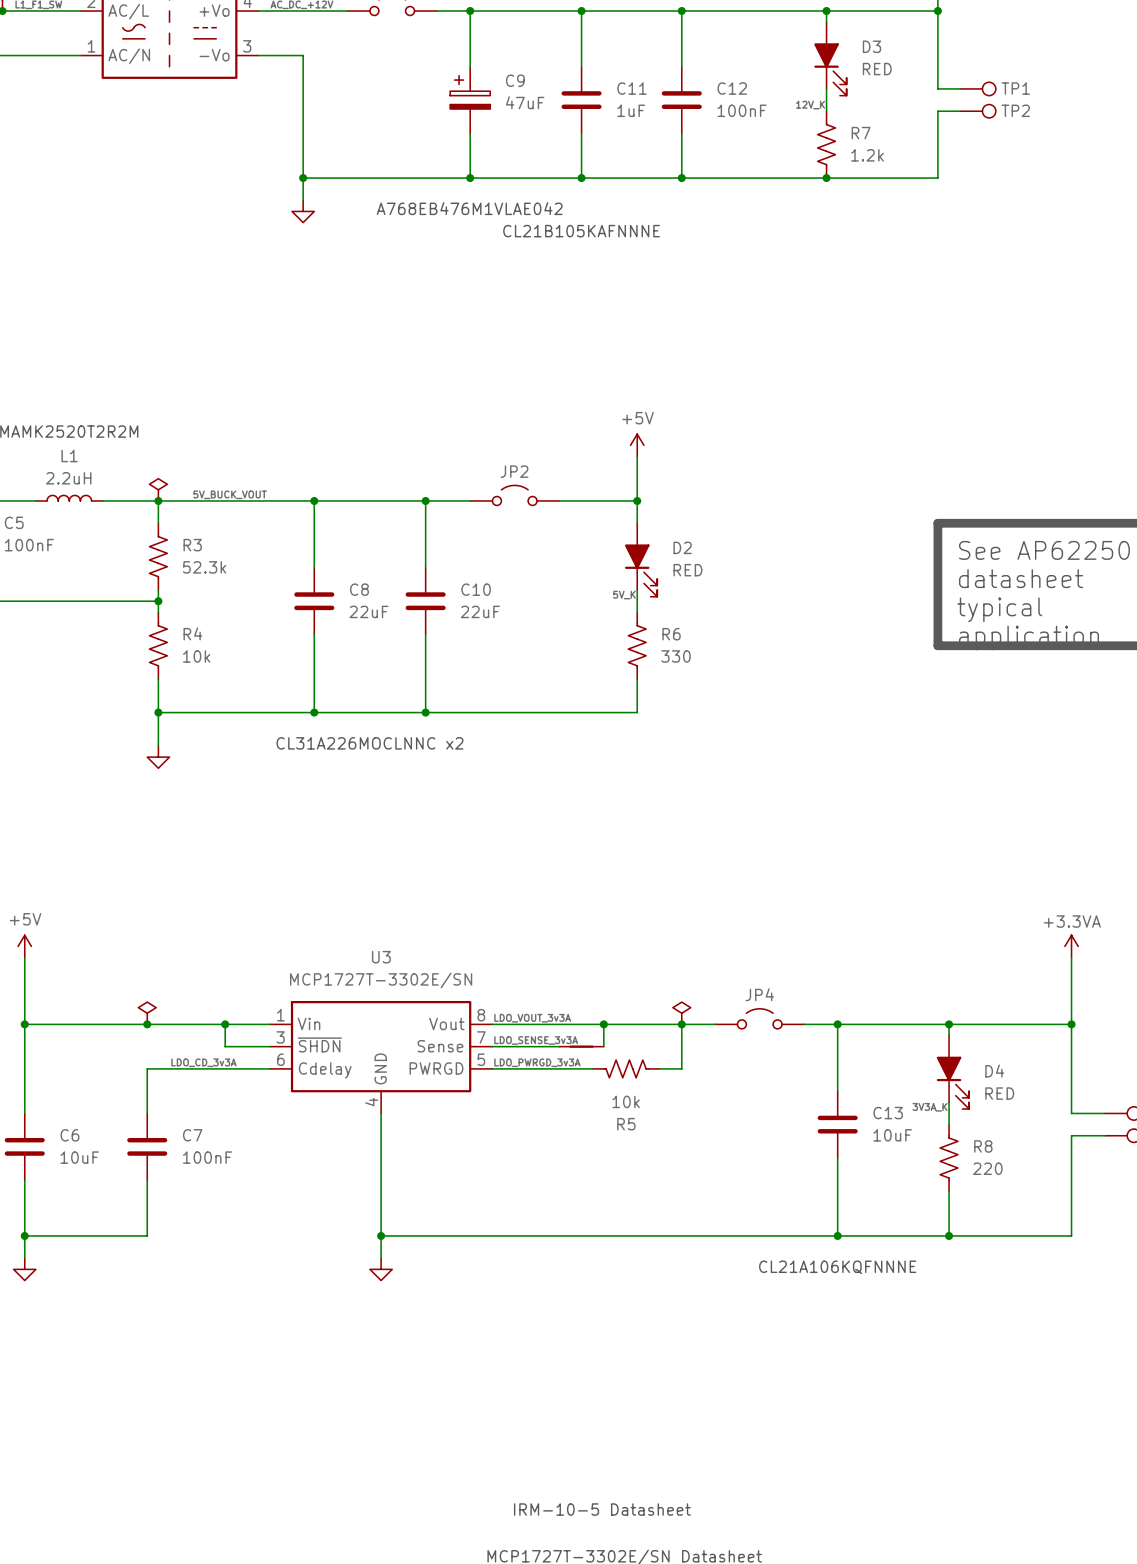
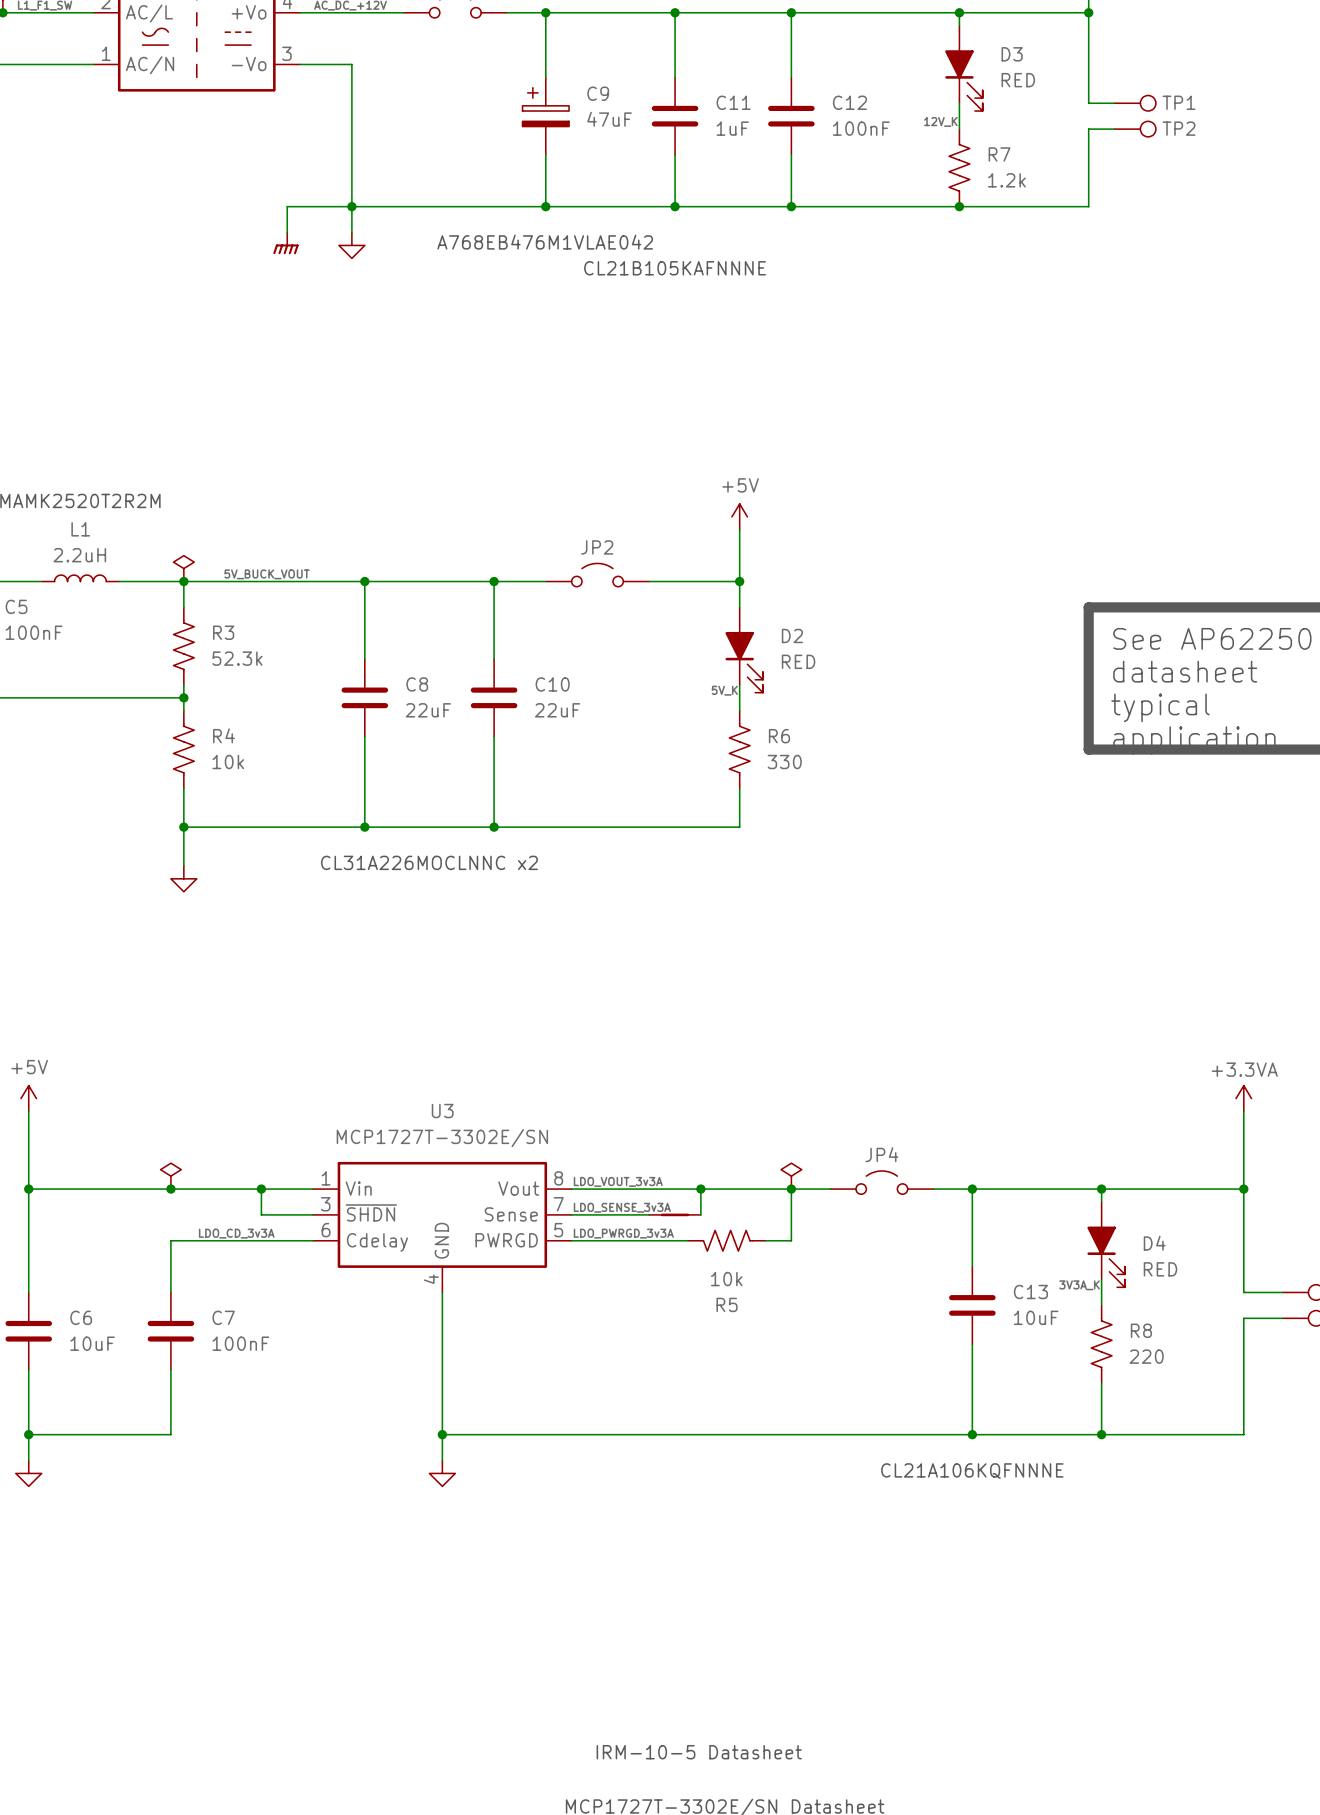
wire: none -> (351, 206) (287, 206) (287, 232)
power symbol: none -> (285, 243)

